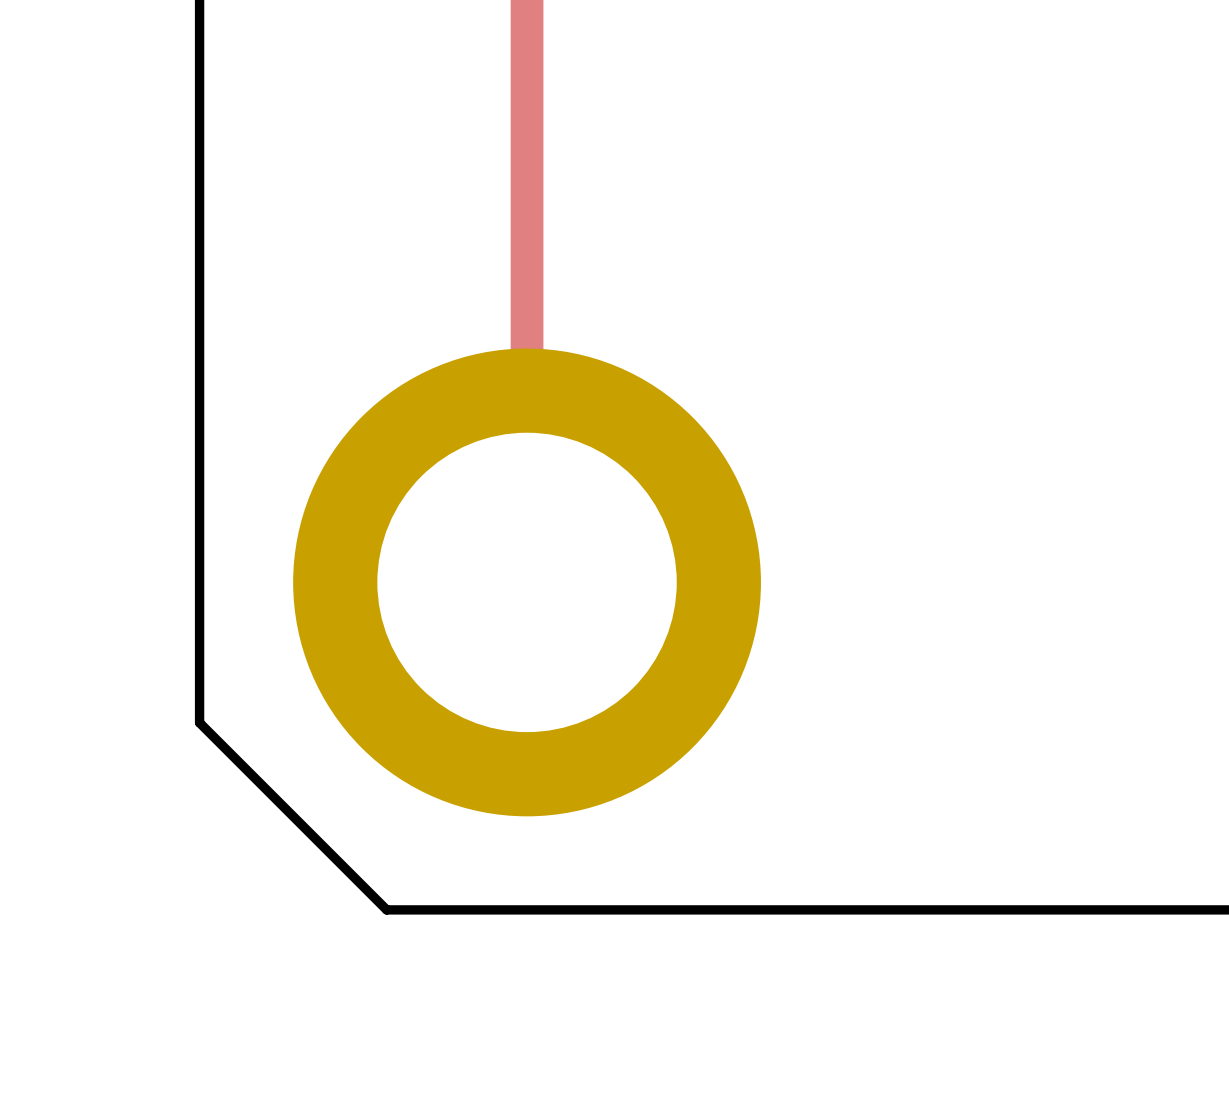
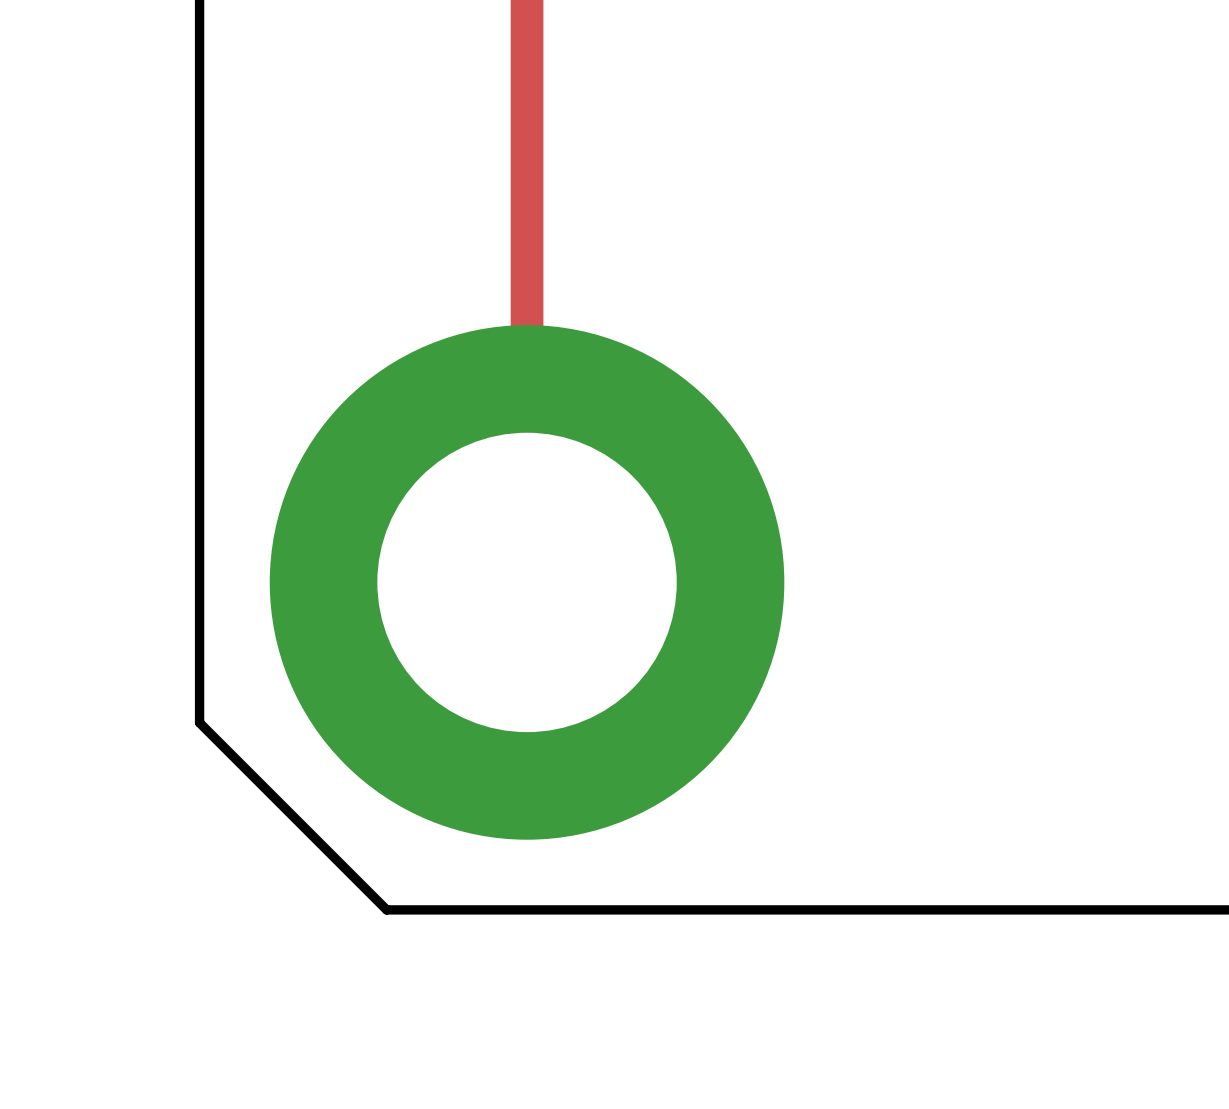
part footprint: [293, 348, 761, 817] -> [269, 325, 785, 840]

